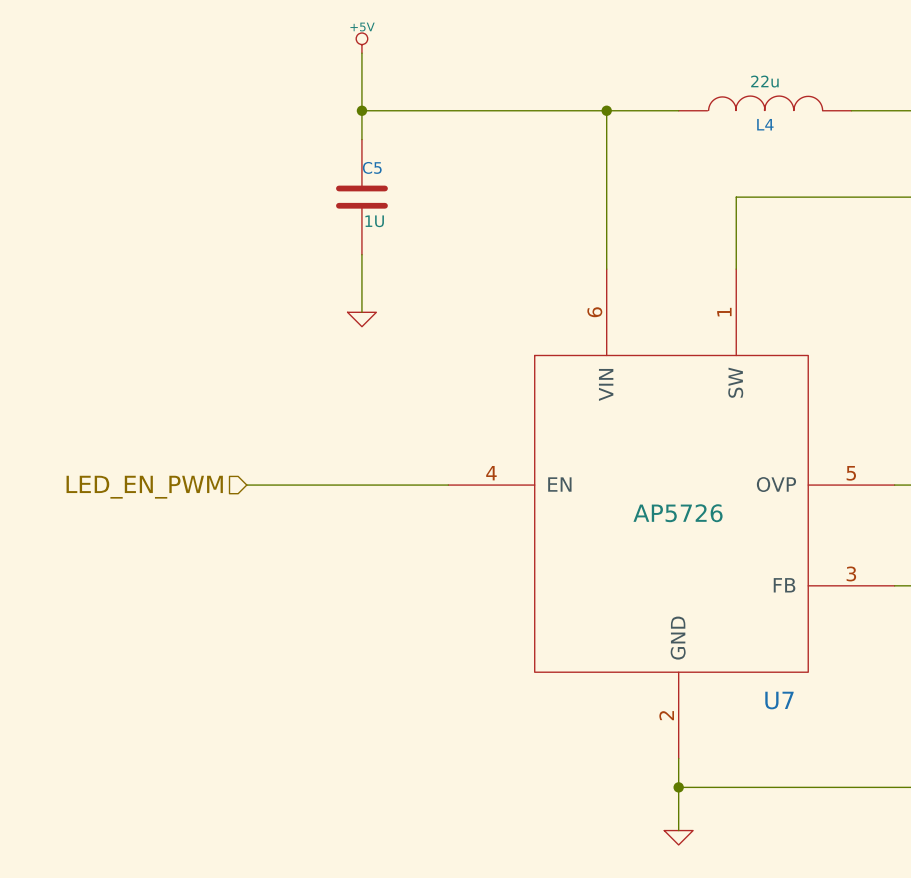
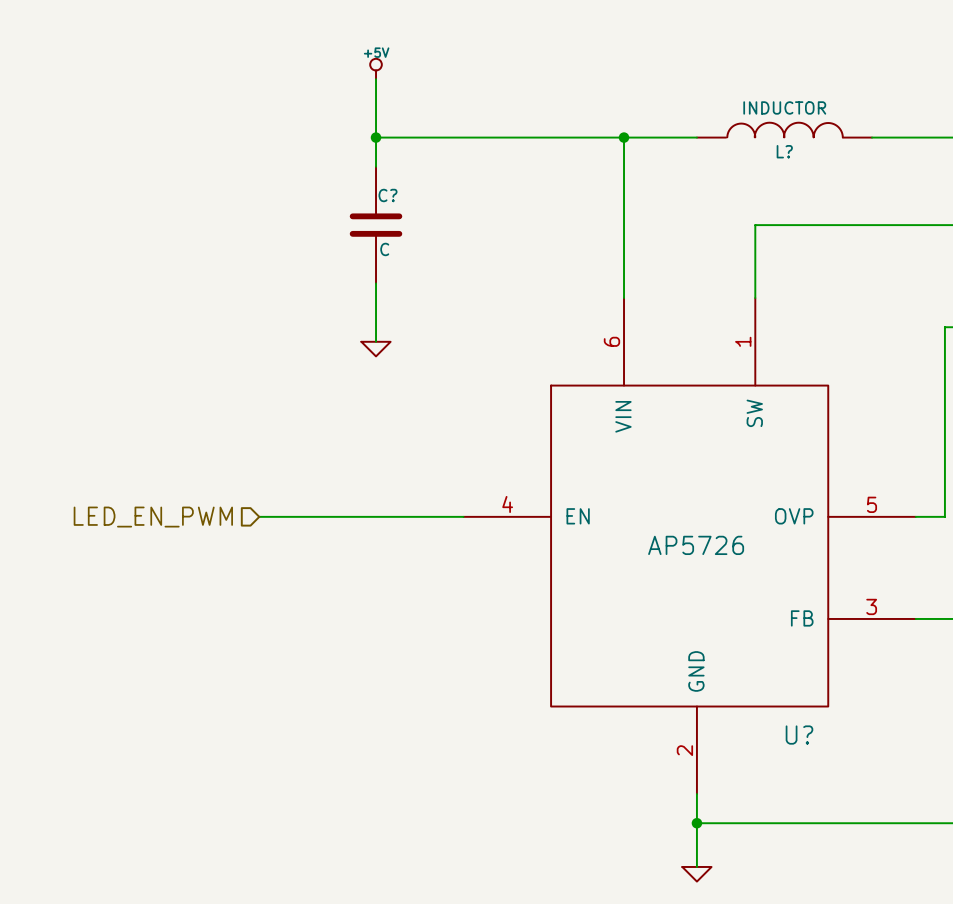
L4 value: 22u (764, 81) -> INDUCTOR (784, 107)
L4 name: L4 (765, 124) -> L? (784, 151)
C5 name: C5 (372, 167) -> C? (388, 195)
C5 value: 1U (374, 221) -> C (384, 249)
U7 name: U7 (779, 700) -> U? (799, 735)

